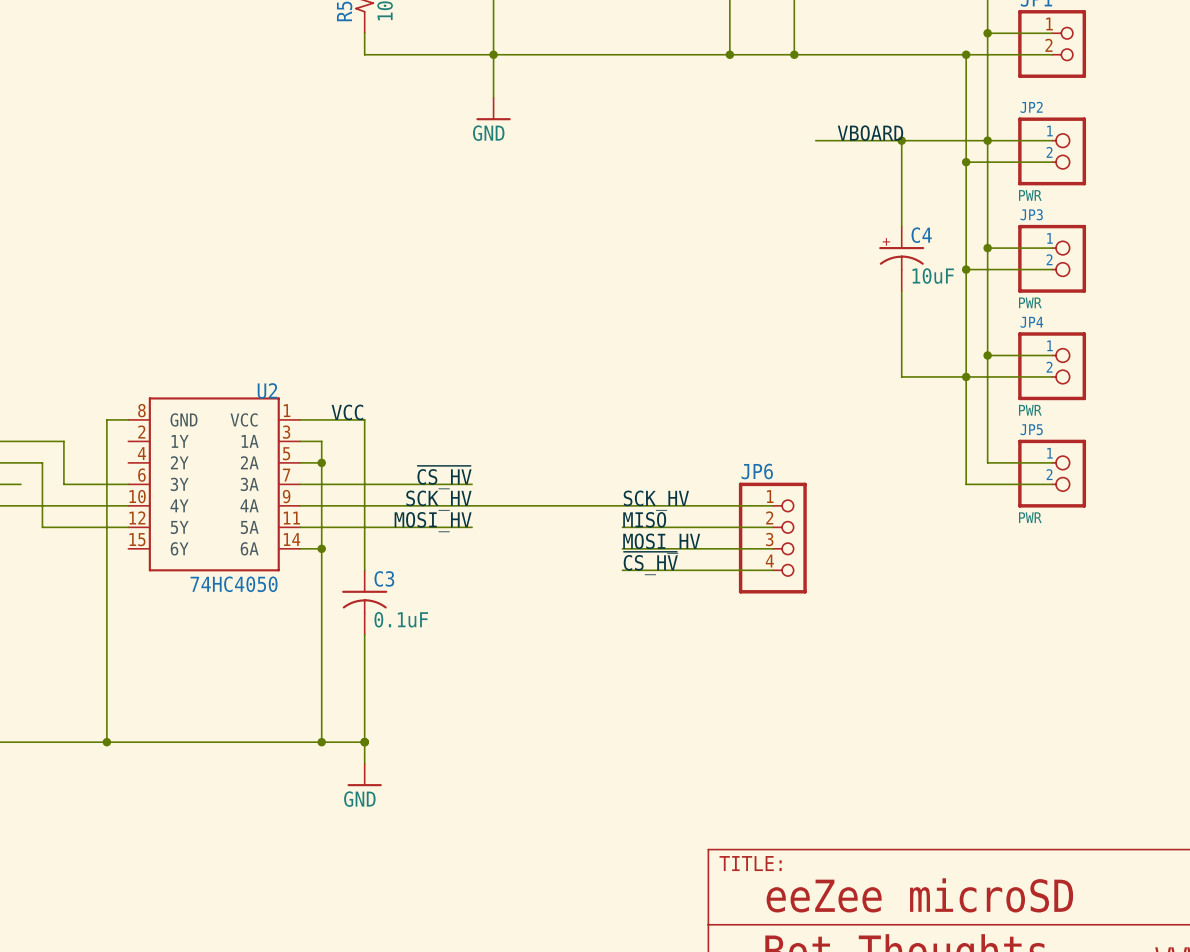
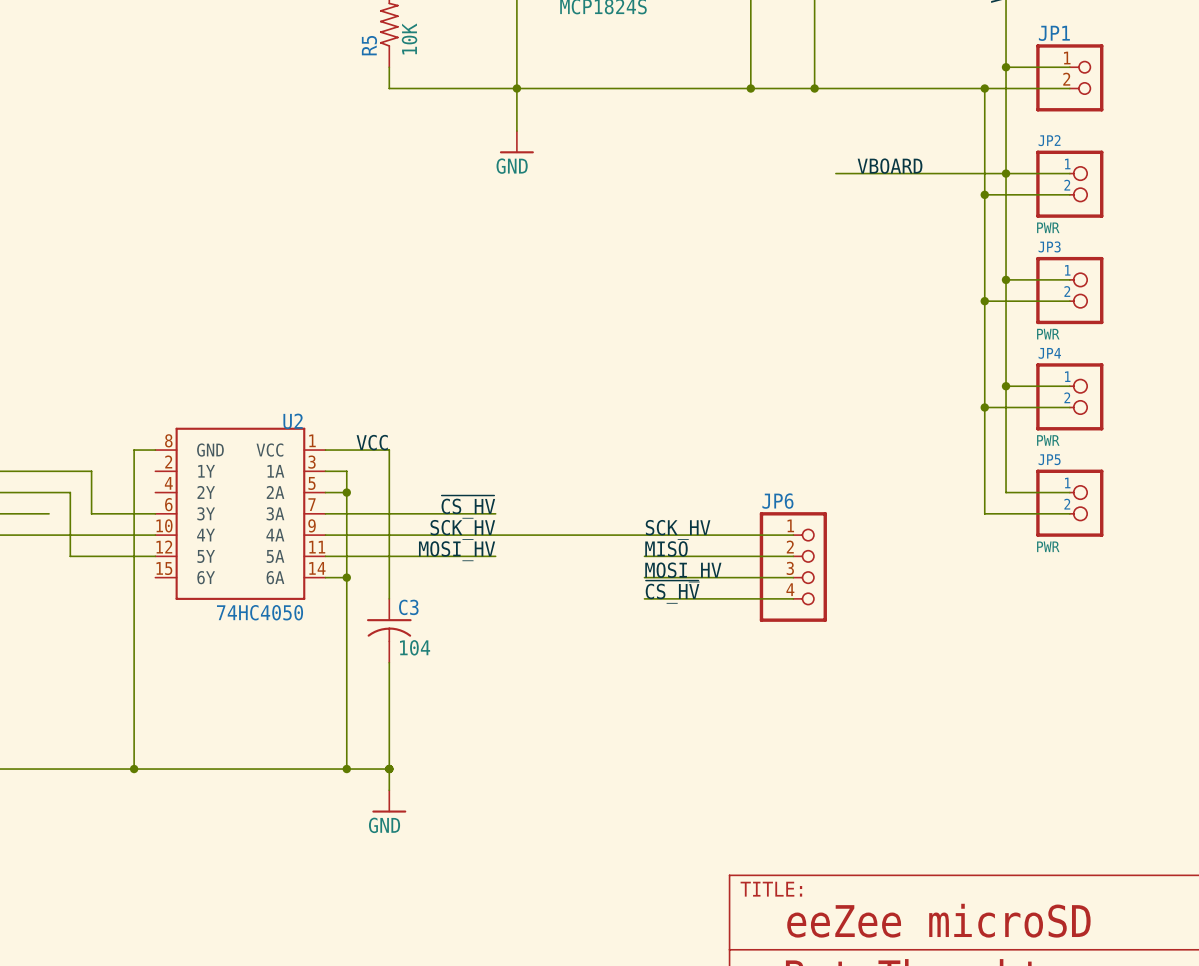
wire: (901, 140) (901, 226) -> none
junction: (901, 140) -> none
C4: 10uF (901, 258) -> none
wire: (901, 291) (901, 376) (966, 376) -> none
C3 value: 0.1uF (401, 619) -> 104 (415, 647)

